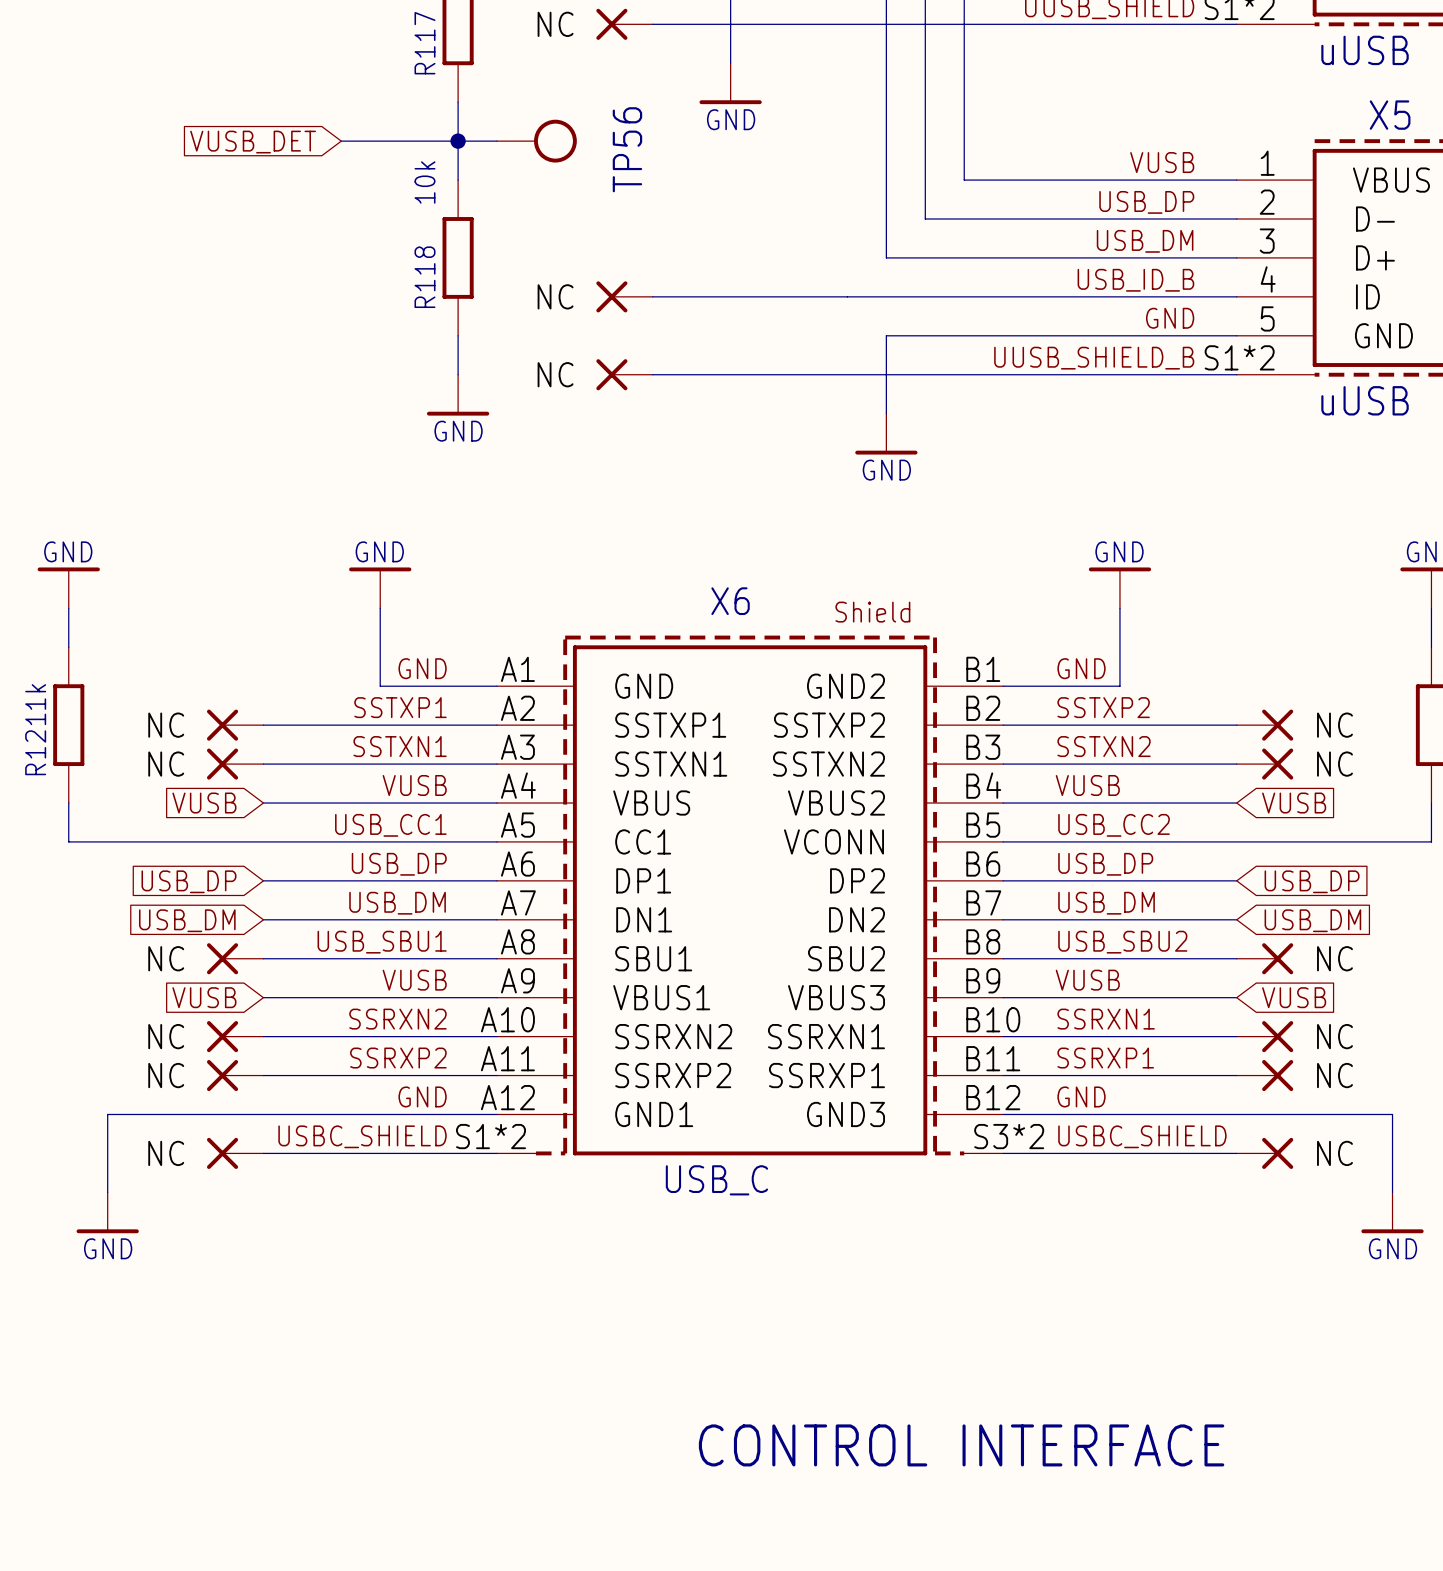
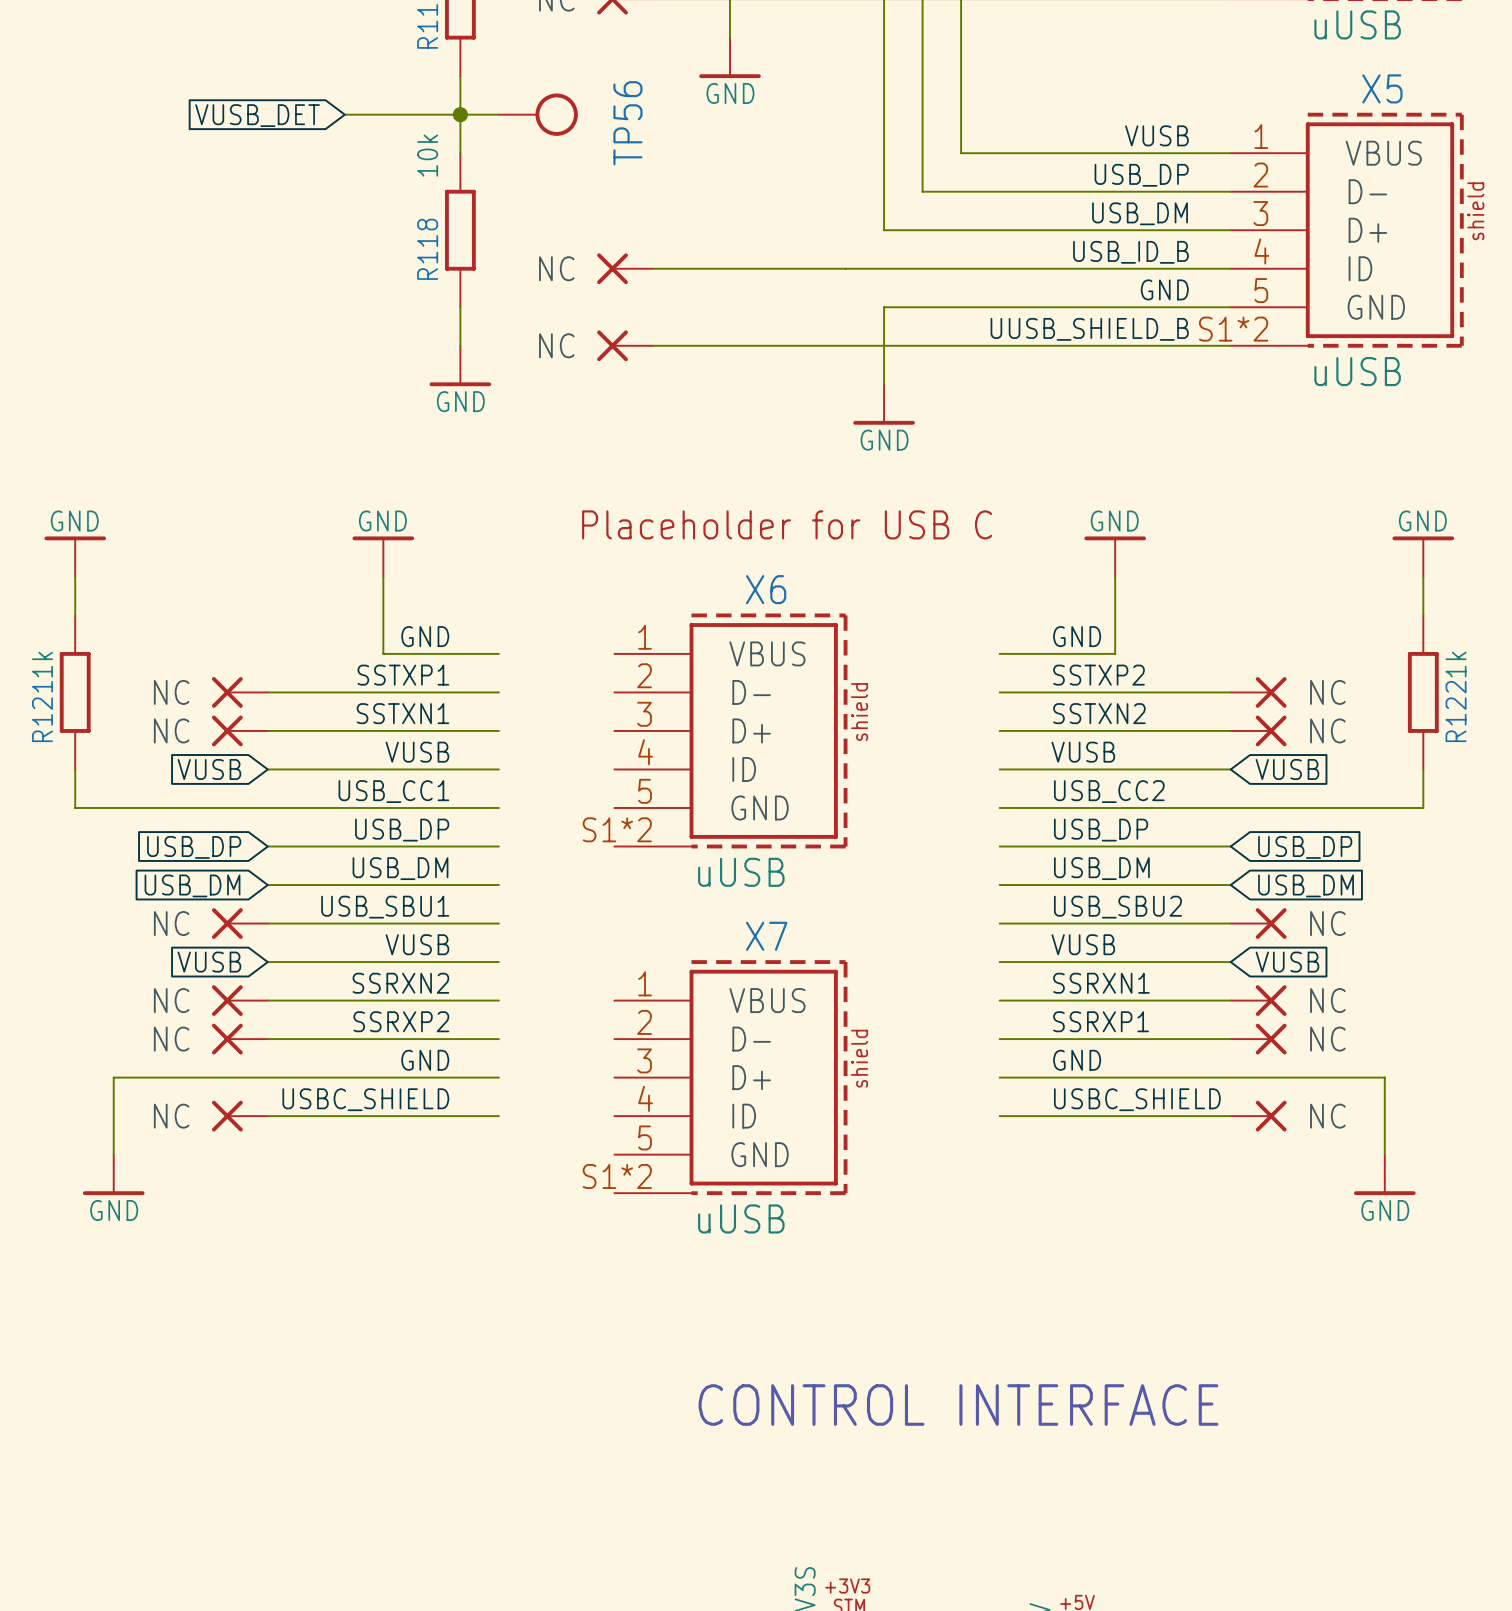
text: none -> Placeholder for USB C (787, 524)
X6 name position: X6 (730, 601) -> X6 (766, 589)
X6 symbol: [497, 635, 1004, 1156] -> [614, 613, 848, 849]
X7: none -> uUSB (730, 1077)
X6 value: USB_C (716, 1180) -> uUSB (741, 872)

